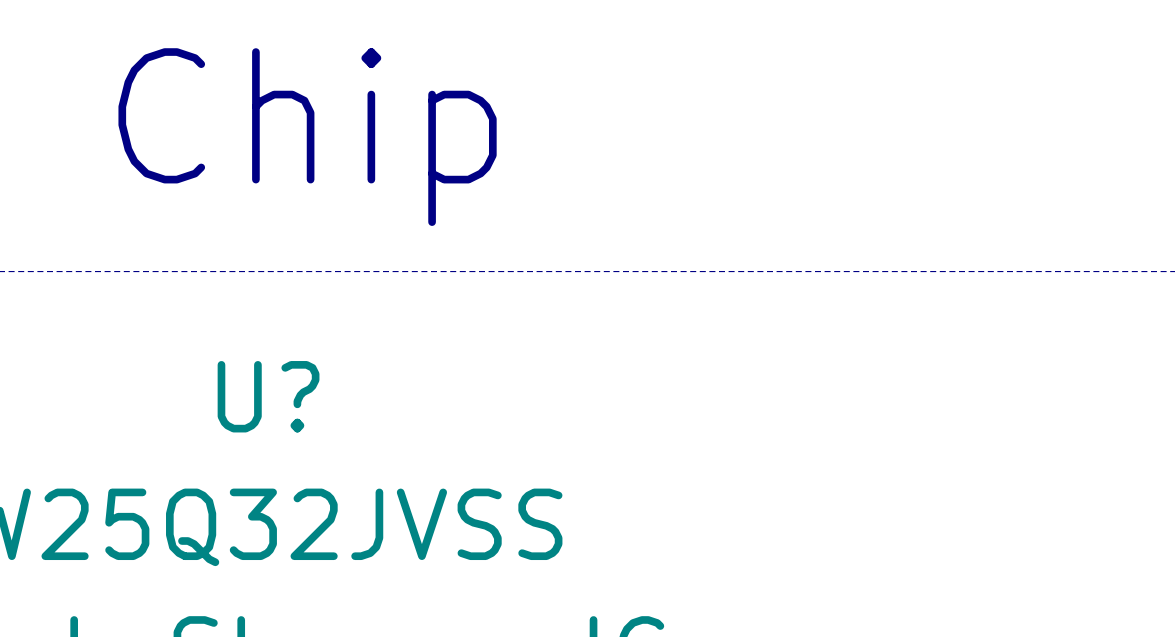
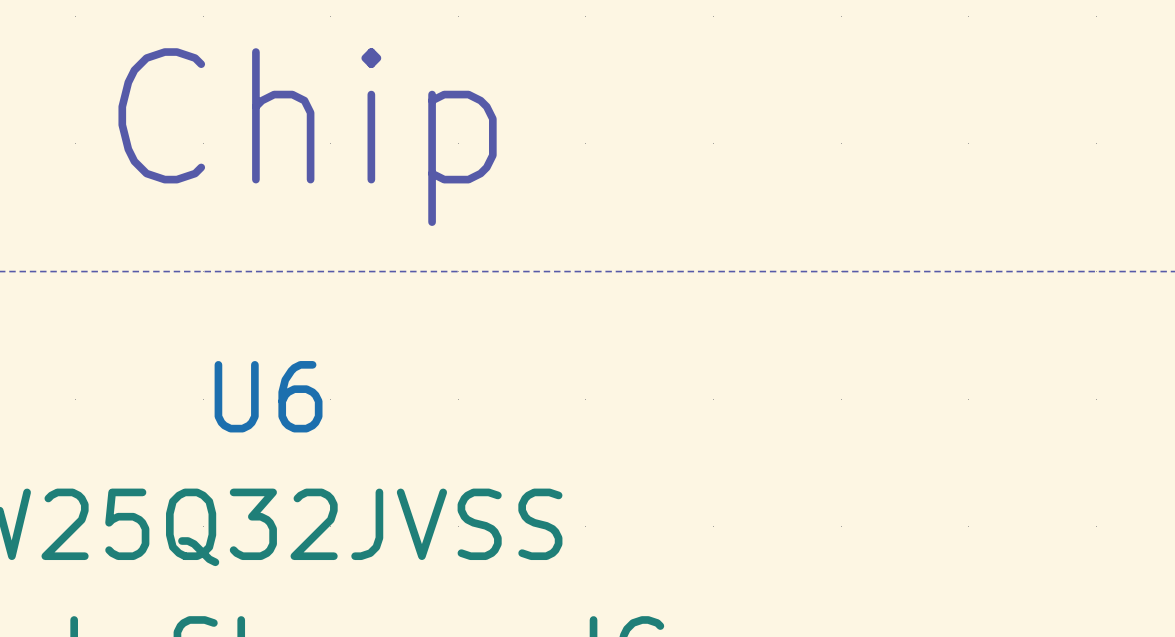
U? name: U? (268, 396) -> U6 (268, 396)

